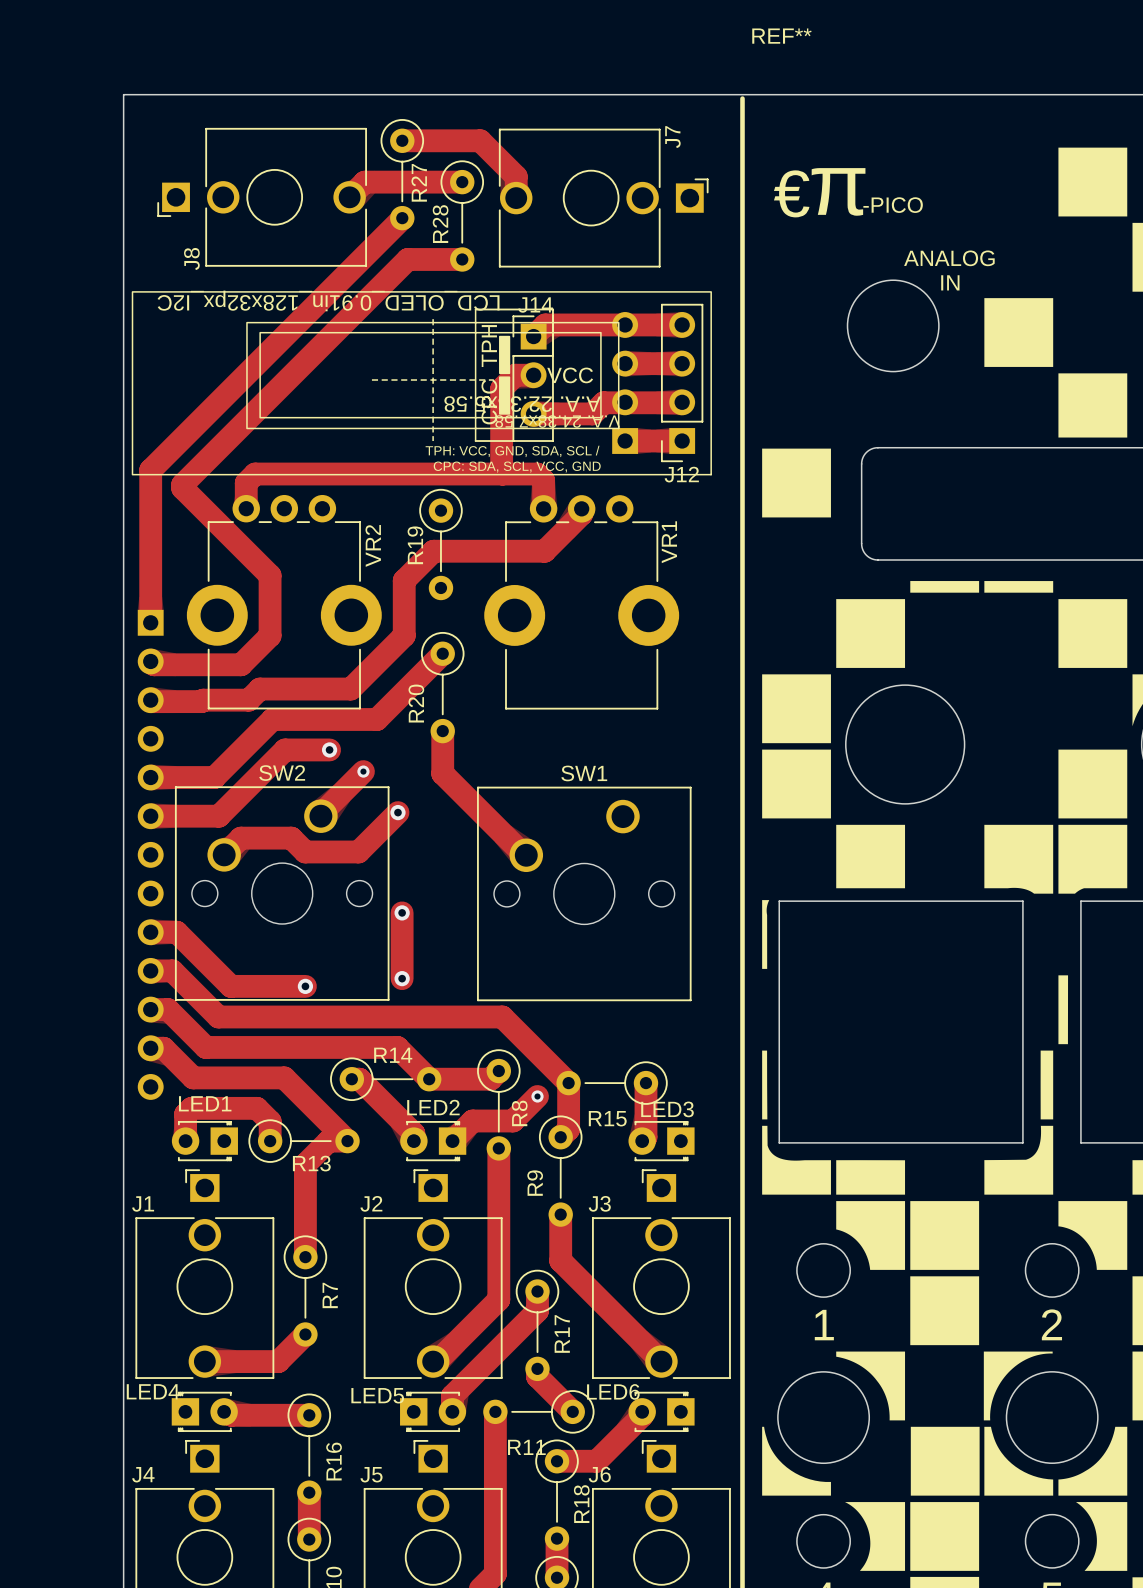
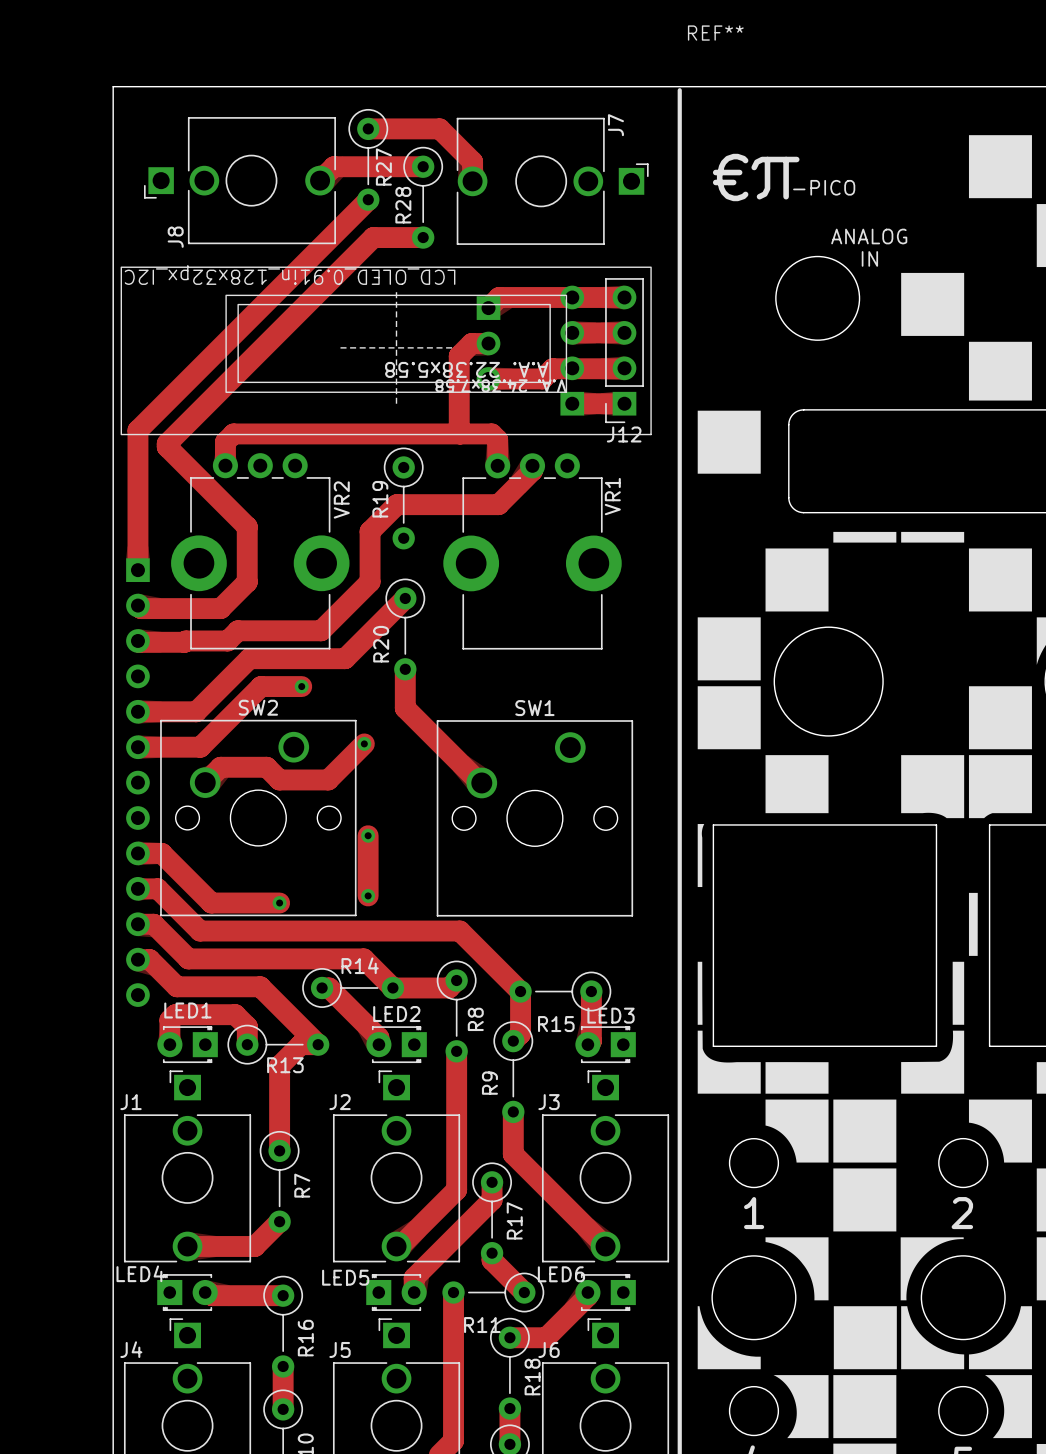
J14 side: top (514, 375) -> bottom (488, 343)
track: (363, 771) (320, 816) -> none
via: (363, 771) -> none
track: (537, 1096) (513, 1120) (472, 1120) (452, 1141) -> none
via: (537, 1096) -> none

